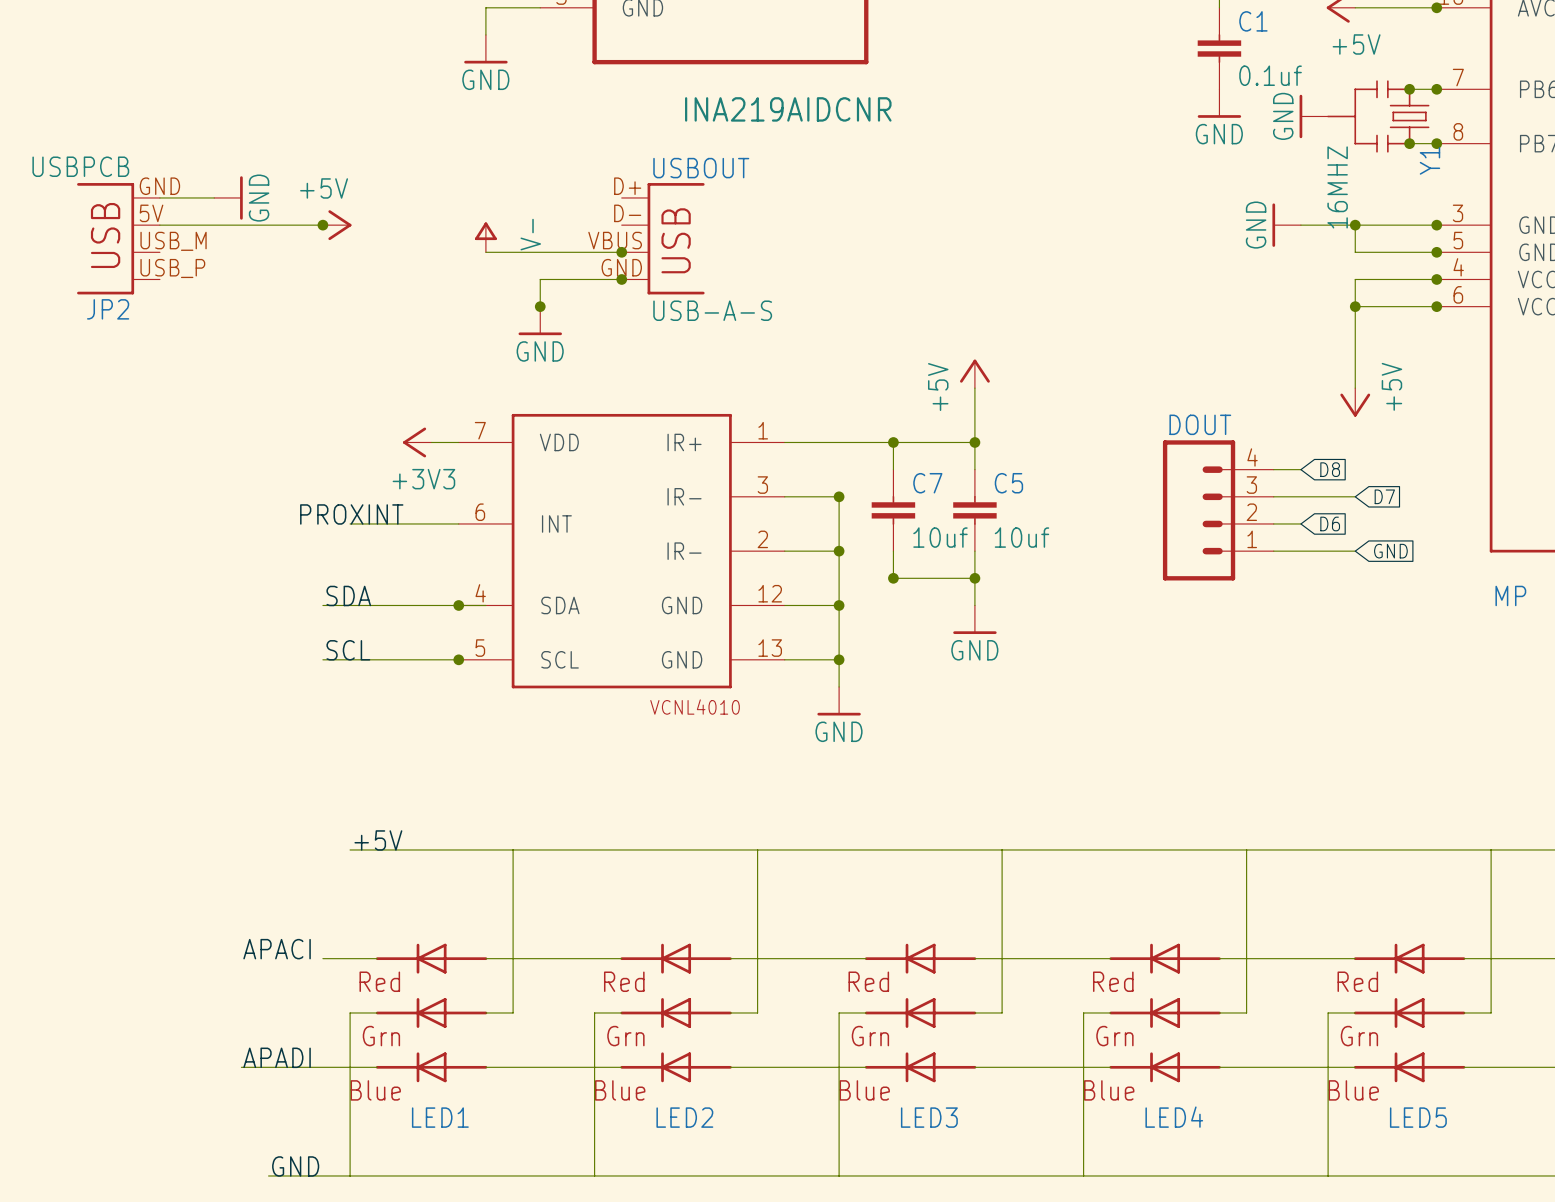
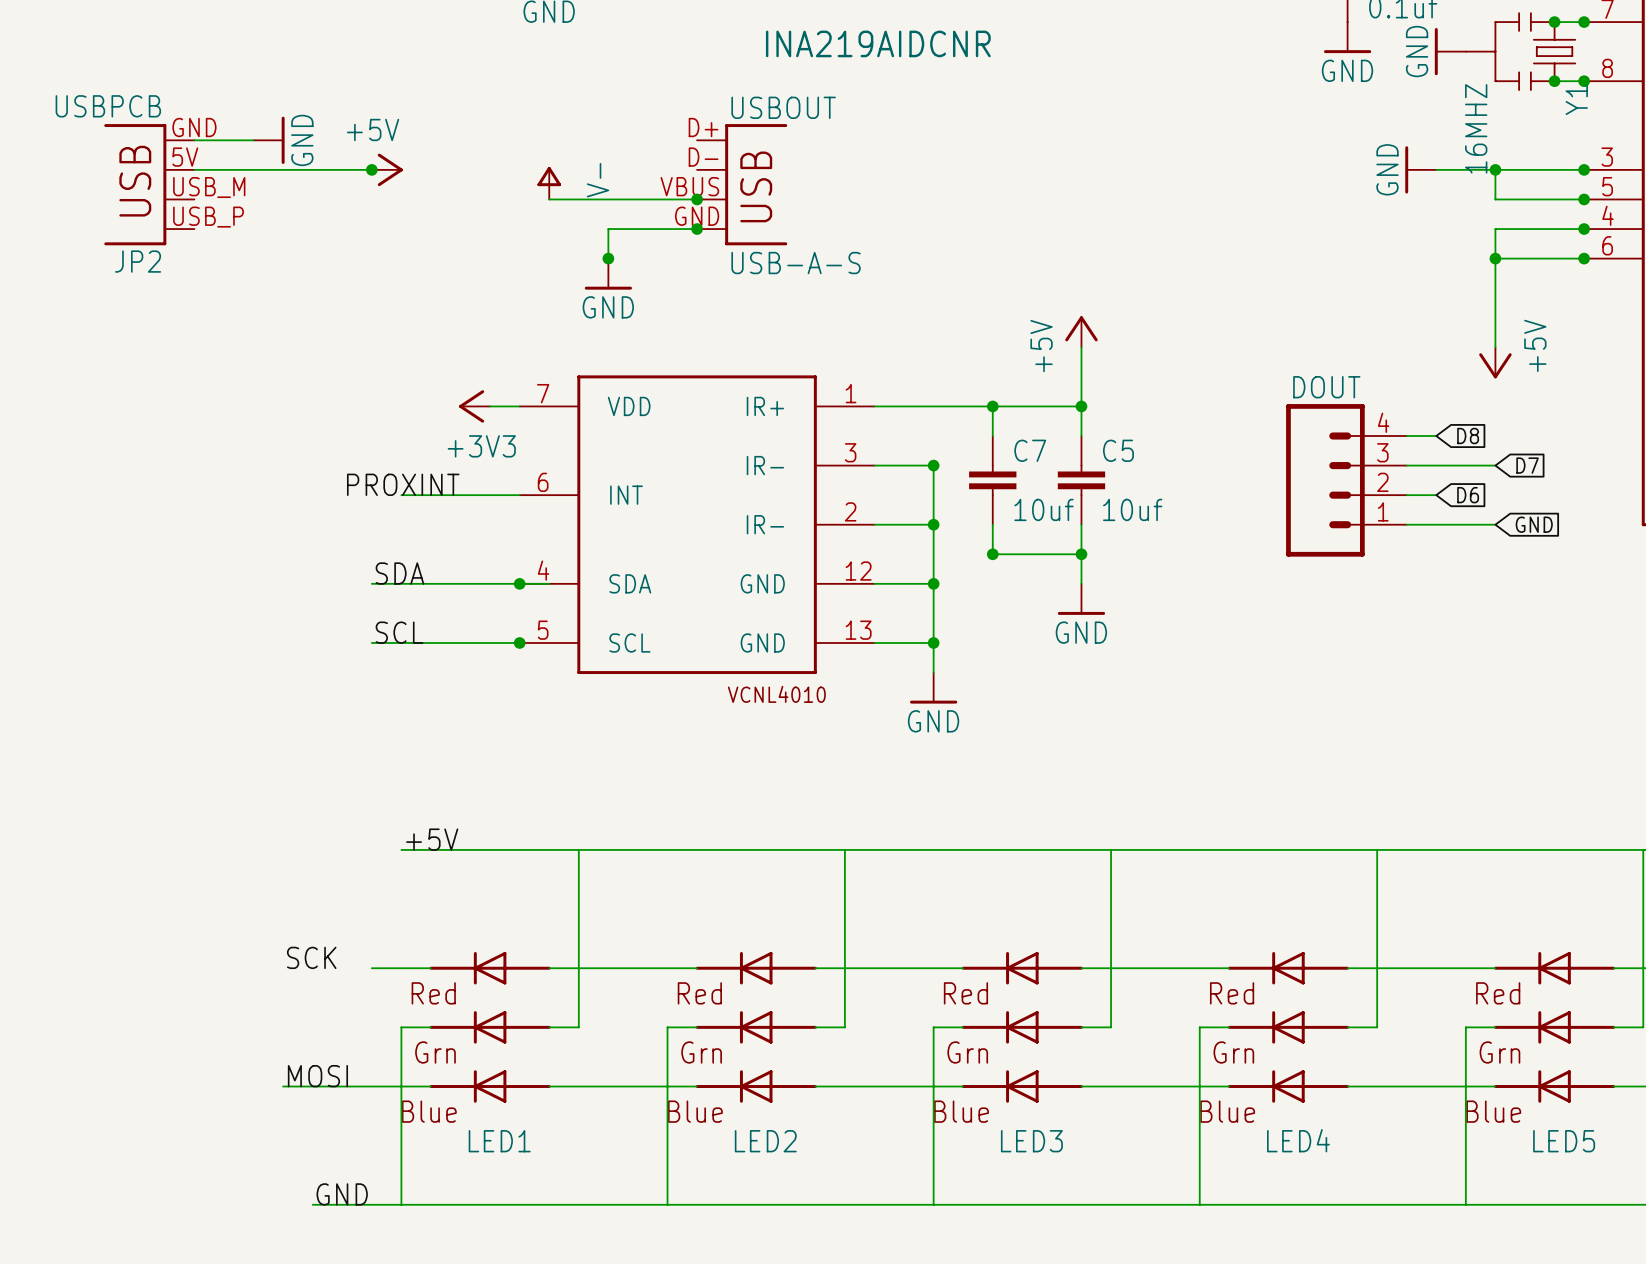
label: APACI (277, 949) -> SCK (311, 957)
label: APADI (277, 1057) -> MOSI (317, 1076)

